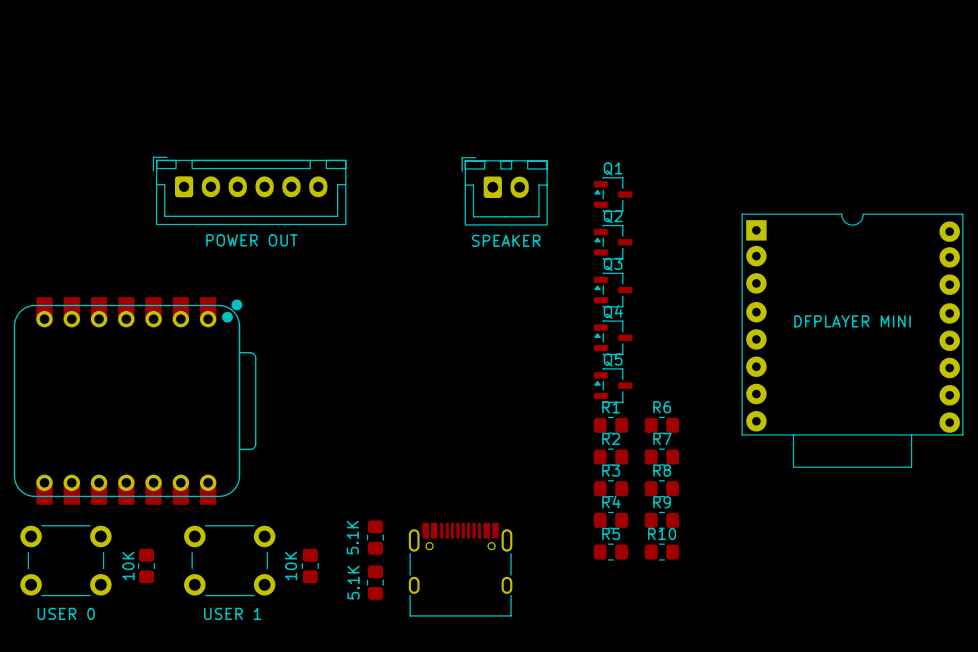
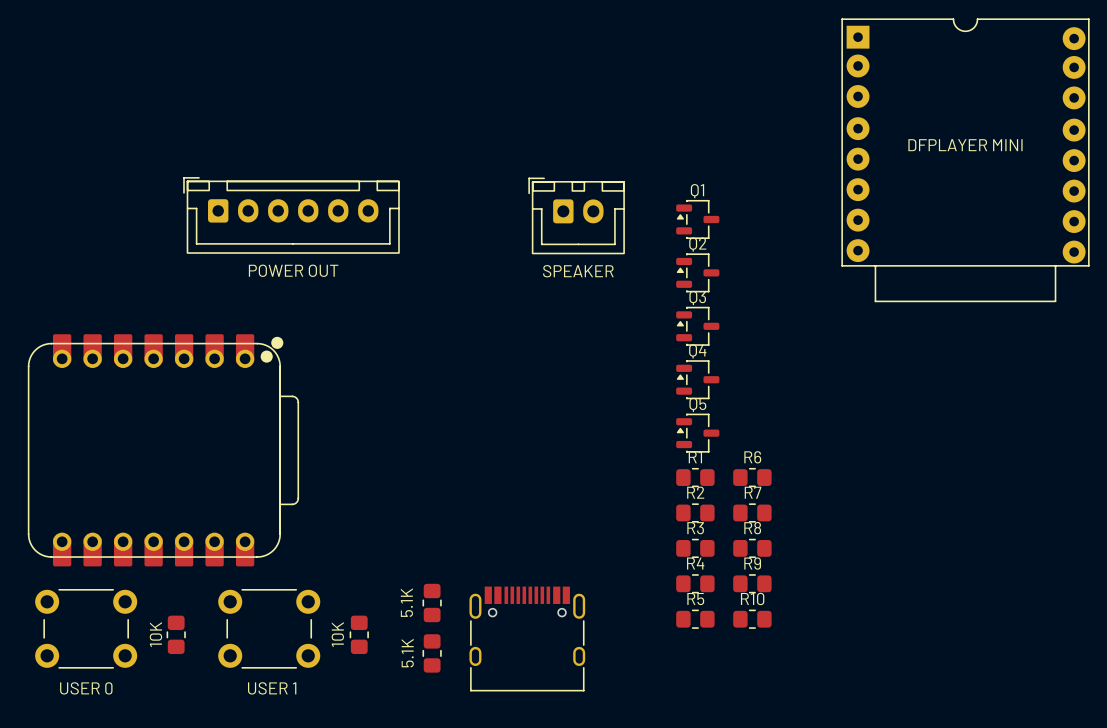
part: none -> DFPLAYER MINI (965, 160)
part: DFPLAYER MINI (852, 340) -> none

